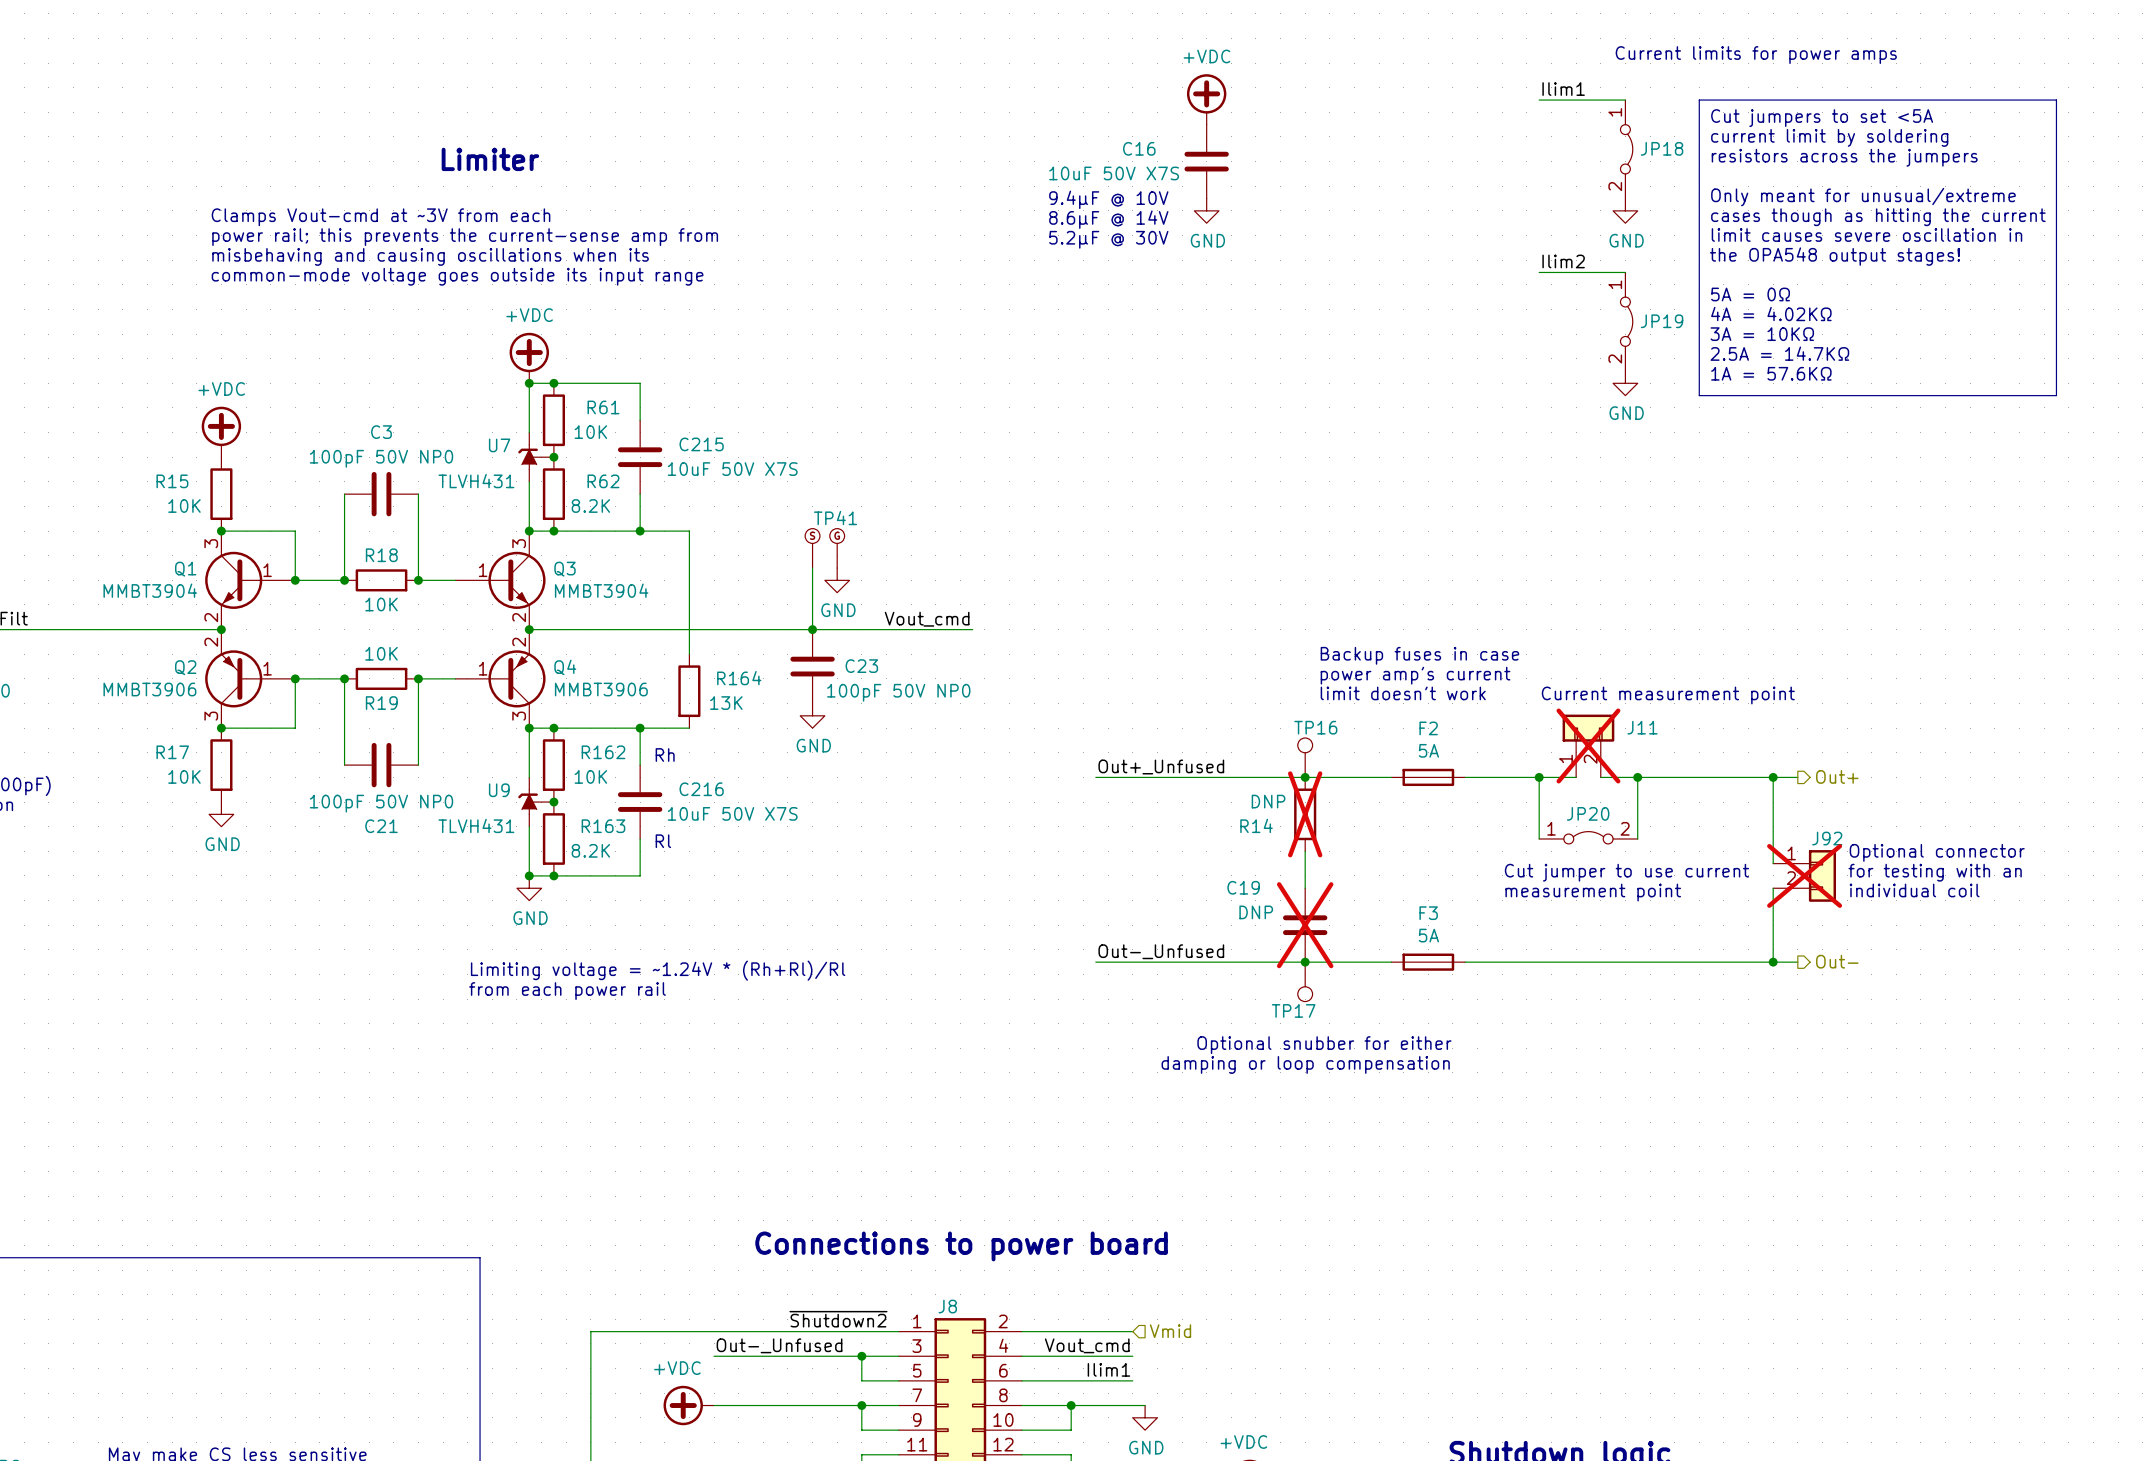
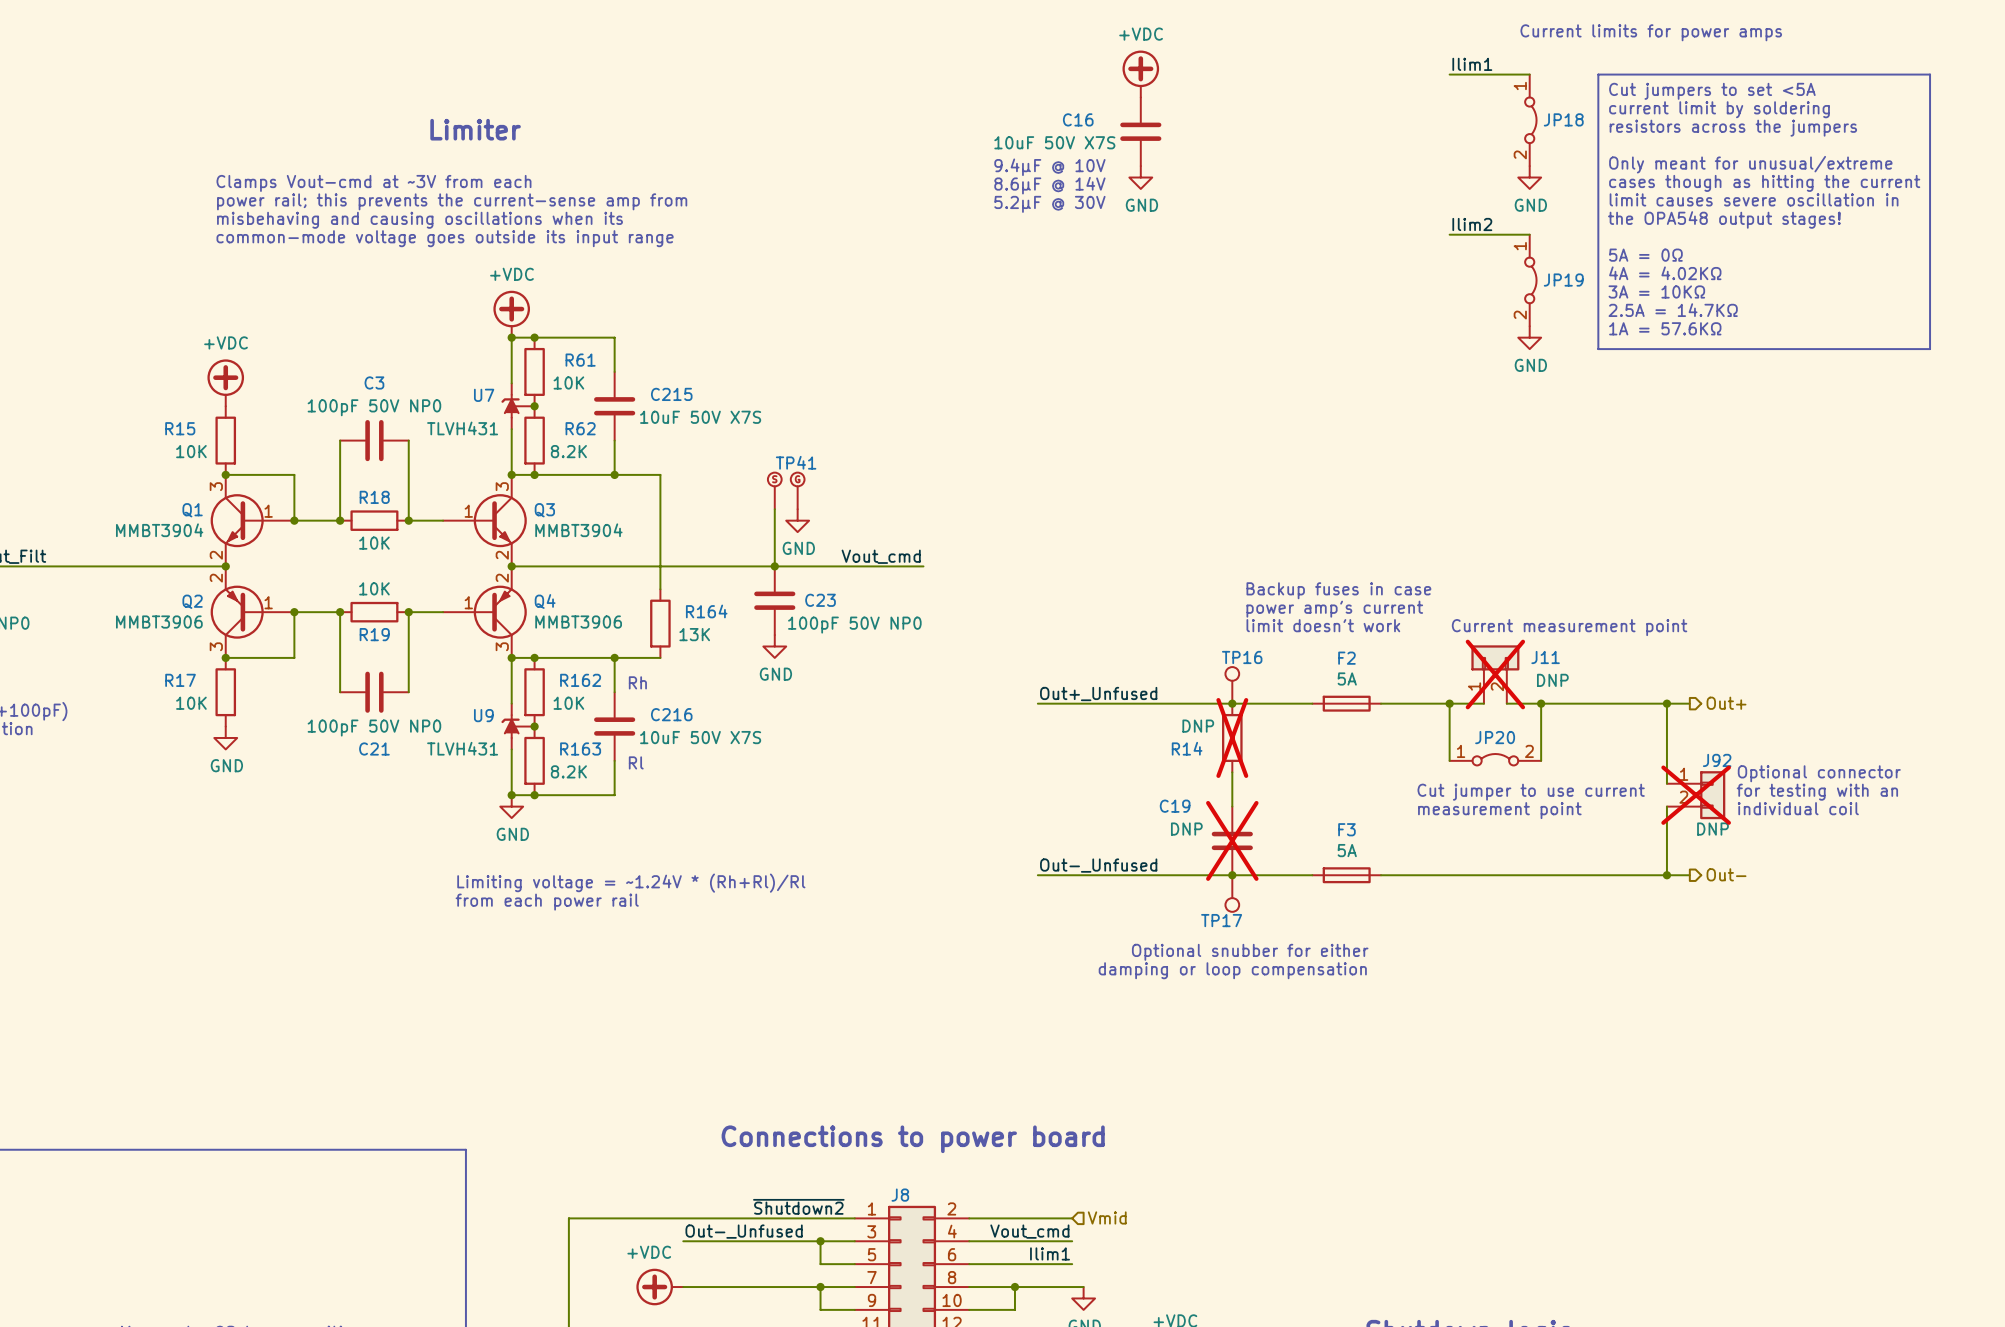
J11 text: none -> DNP (1552, 680)
J92 text: none -> DNP (1712, 829)

